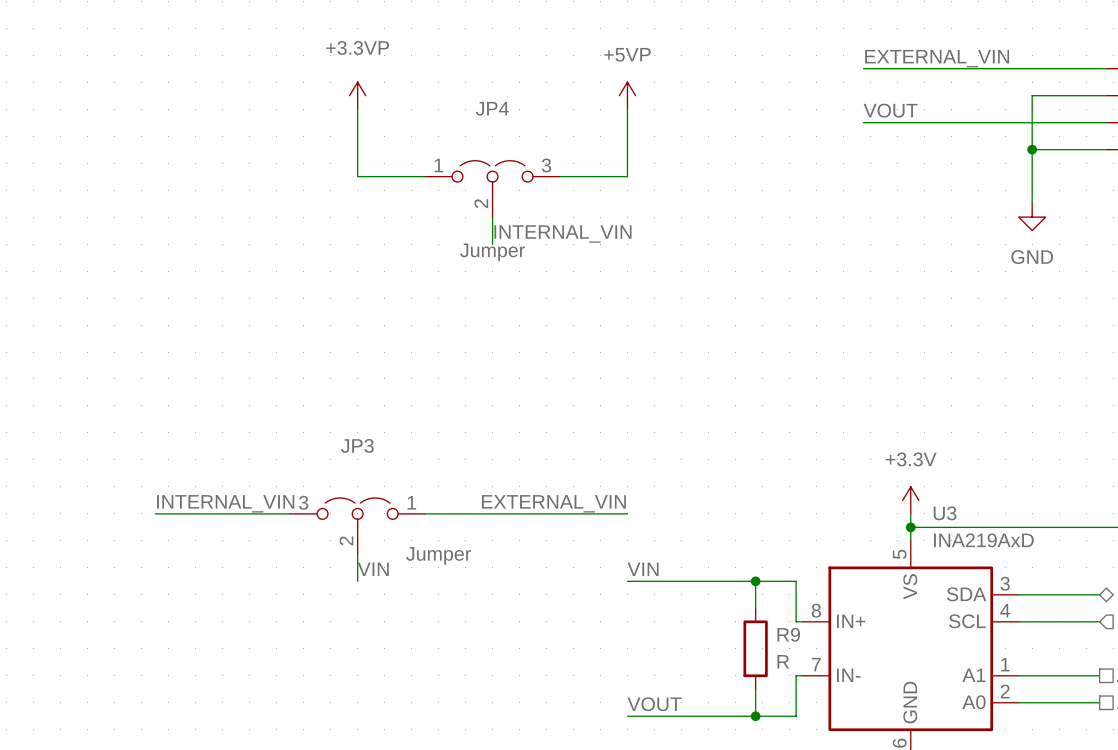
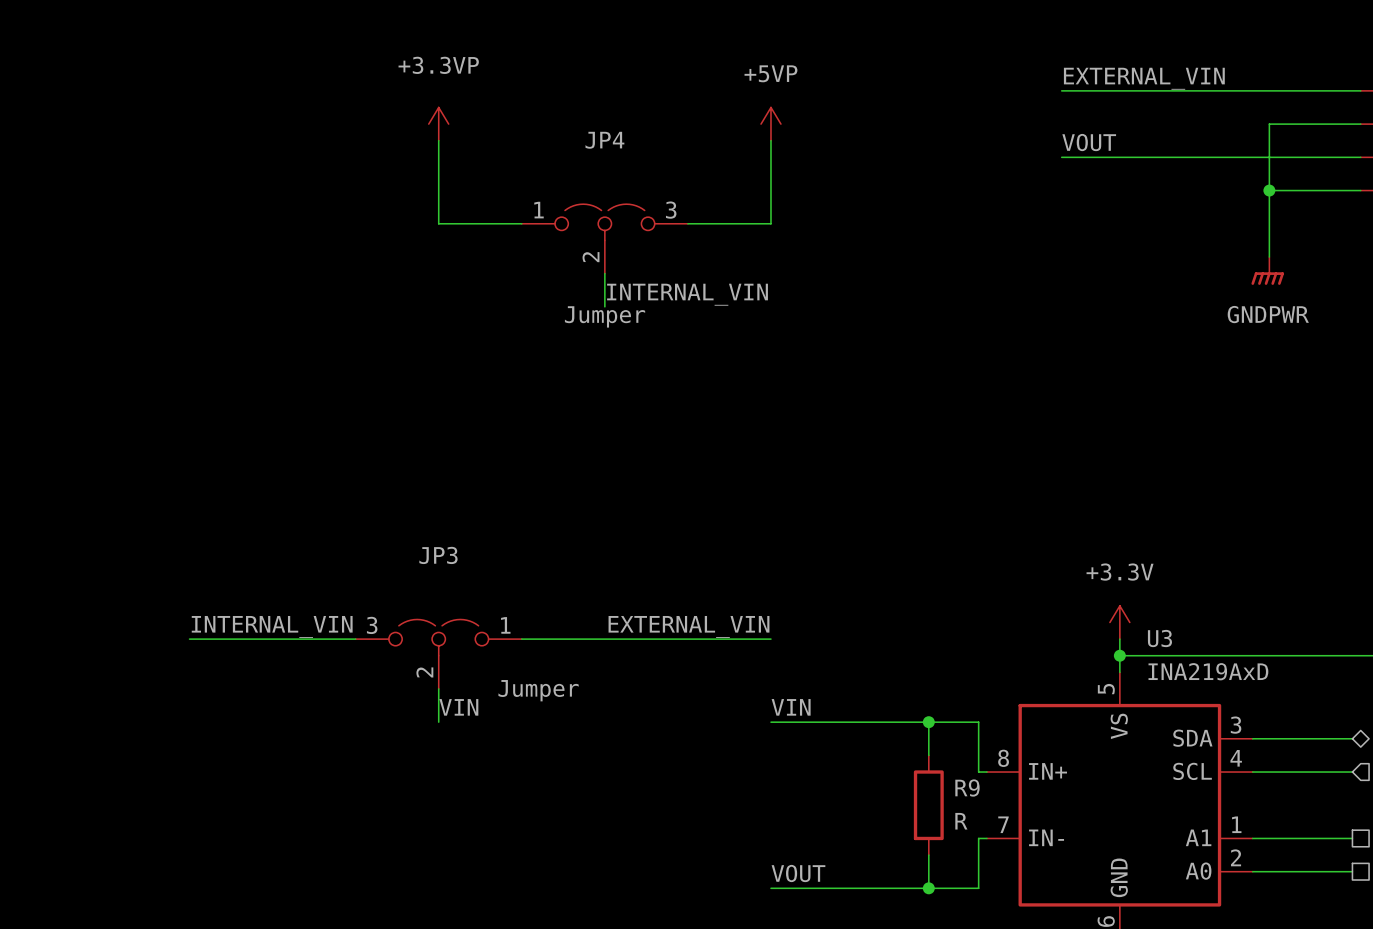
power symbol: GND (1032, 217) -> GNDPWR (1267, 270)

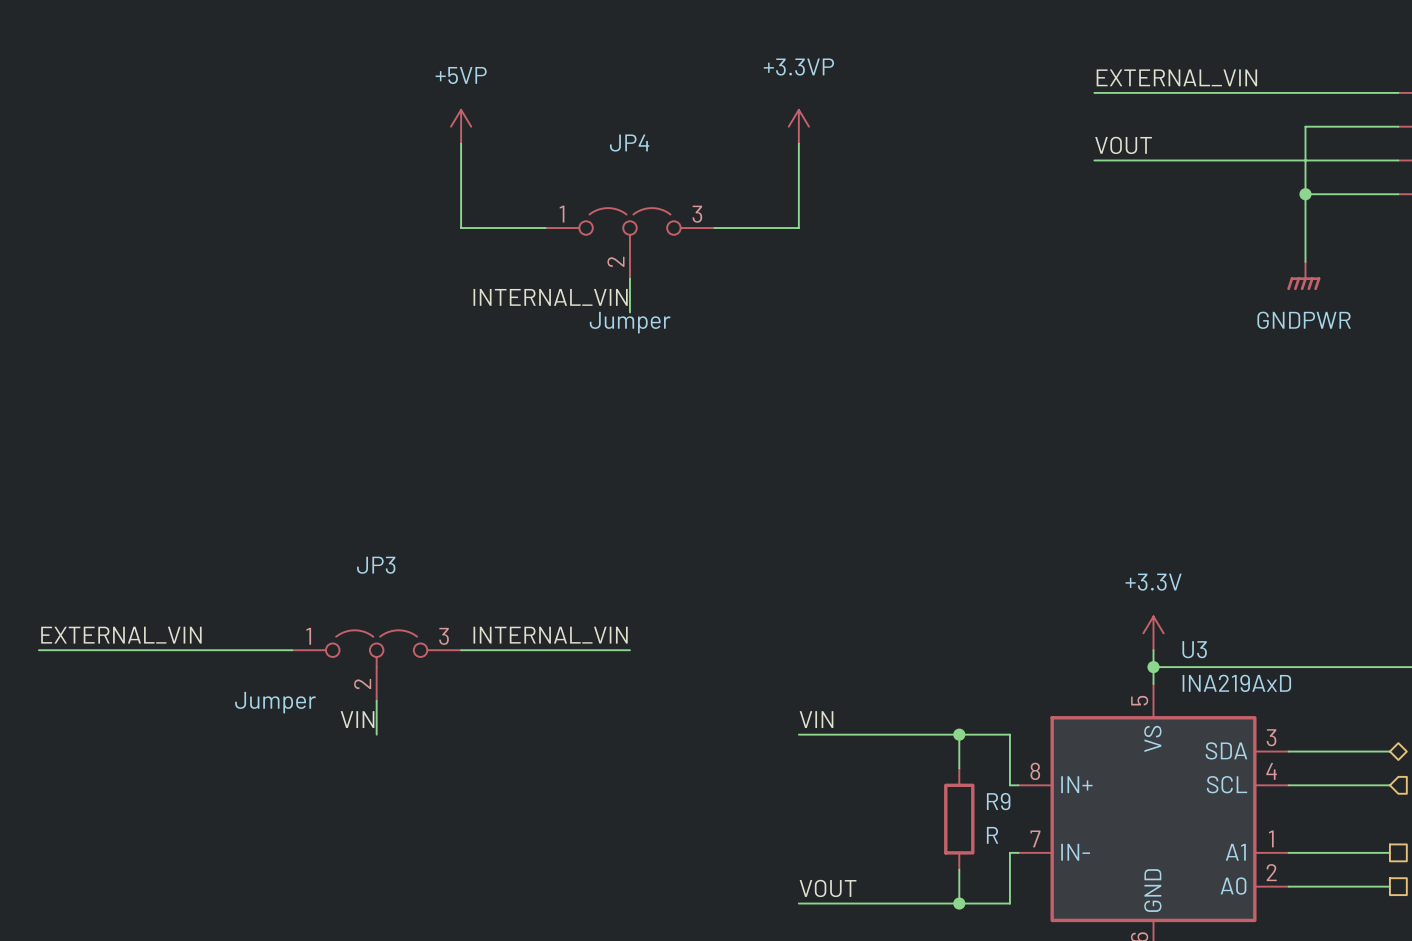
power symbol: +3.3VP (438, 124) -> +5VP (461, 126)
power symbol: +5VP (770, 124) -> +3.3VP (798, 126)
label position: INTERNAL_VIN (687, 294) -> INTERNAL_VIN (550, 297)
label: INTERNAL_VIN (272, 626) -> EXTERNAL_VIN (121, 635)
label: EXTERNAL_VIN (689, 626) -> INTERNAL_VIN (550, 635)
JP3 flip: as is (438, 637) -> left-right (376, 648)
wire: none -> (38, 650) (207, 650)
wire: (272, 639) (355, 639) -> (461, 650) (545, 650)
wire: (604, 639) (770, 639) -> none
wire: (438, 688) (438, 722) -> (376, 700) (376, 734)
label position: VIN (458, 707) -> VIN (357, 719)

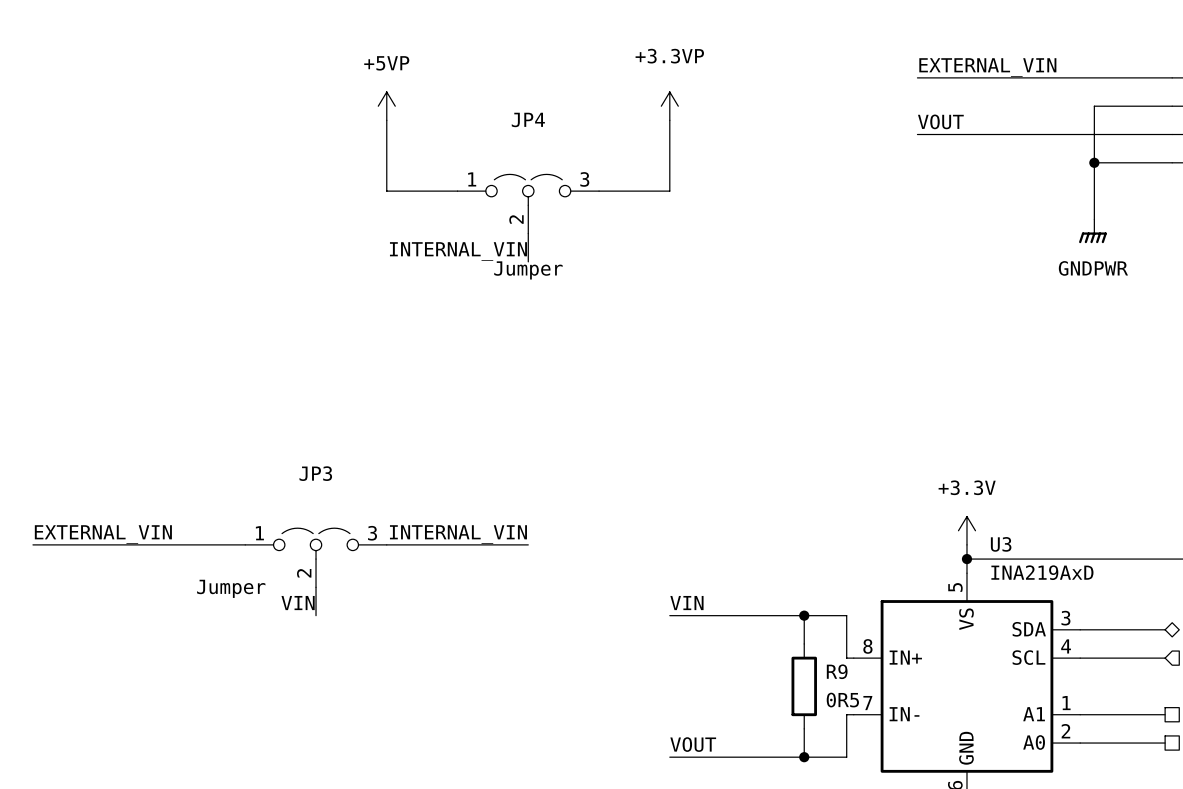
R9 value: R (992, 835) -> 0R5 (842, 700)

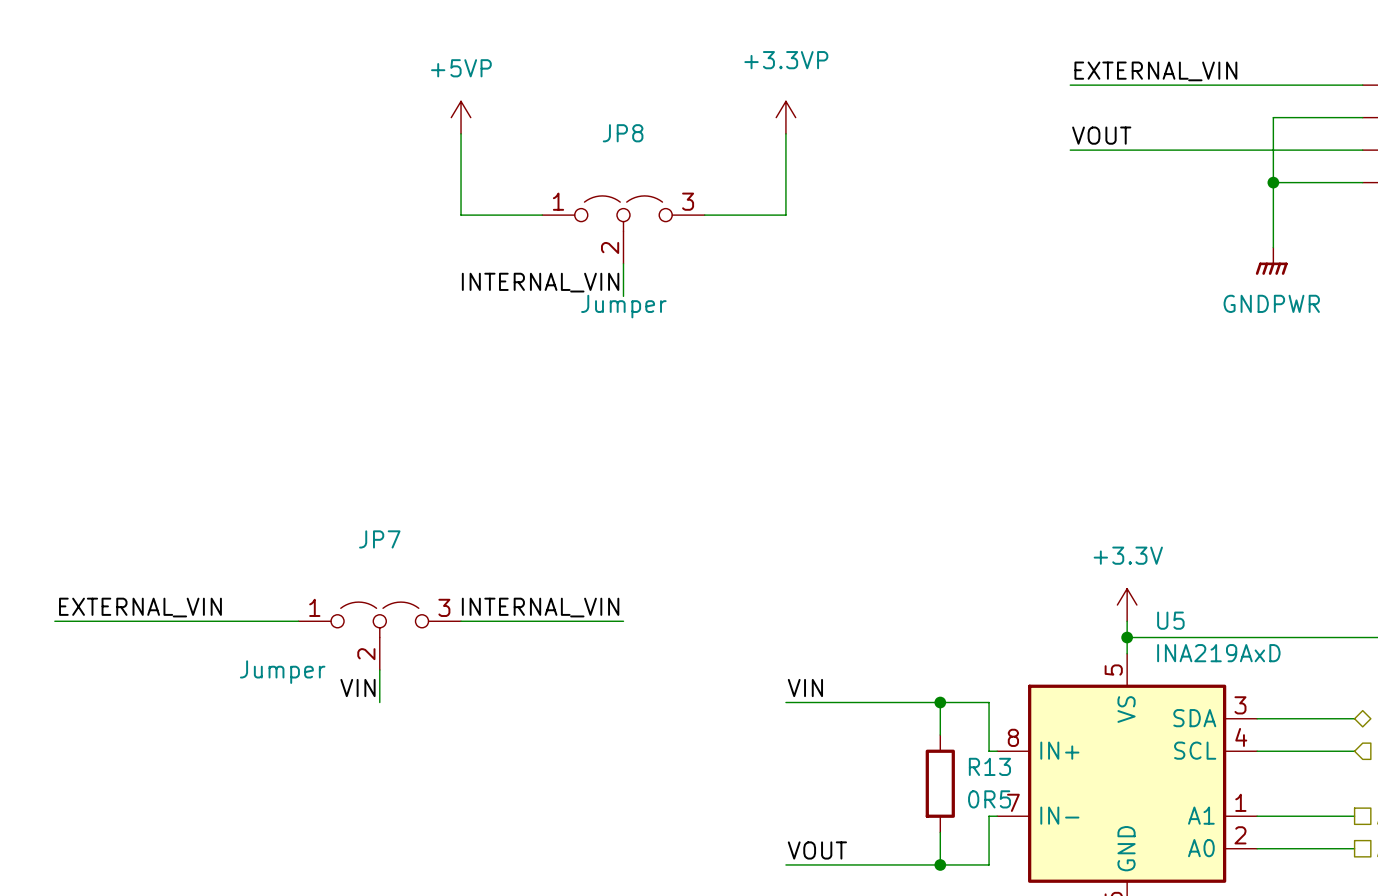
JP4 name: JP4 (528, 119) -> JP8 (623, 133)
JP3 name: JP3 (315, 473) -> JP7 (379, 539)
U3 name: U3 (1001, 544) -> U5 (1170, 620)
R9 name: R9 (837, 671) -> R13 (989, 766)

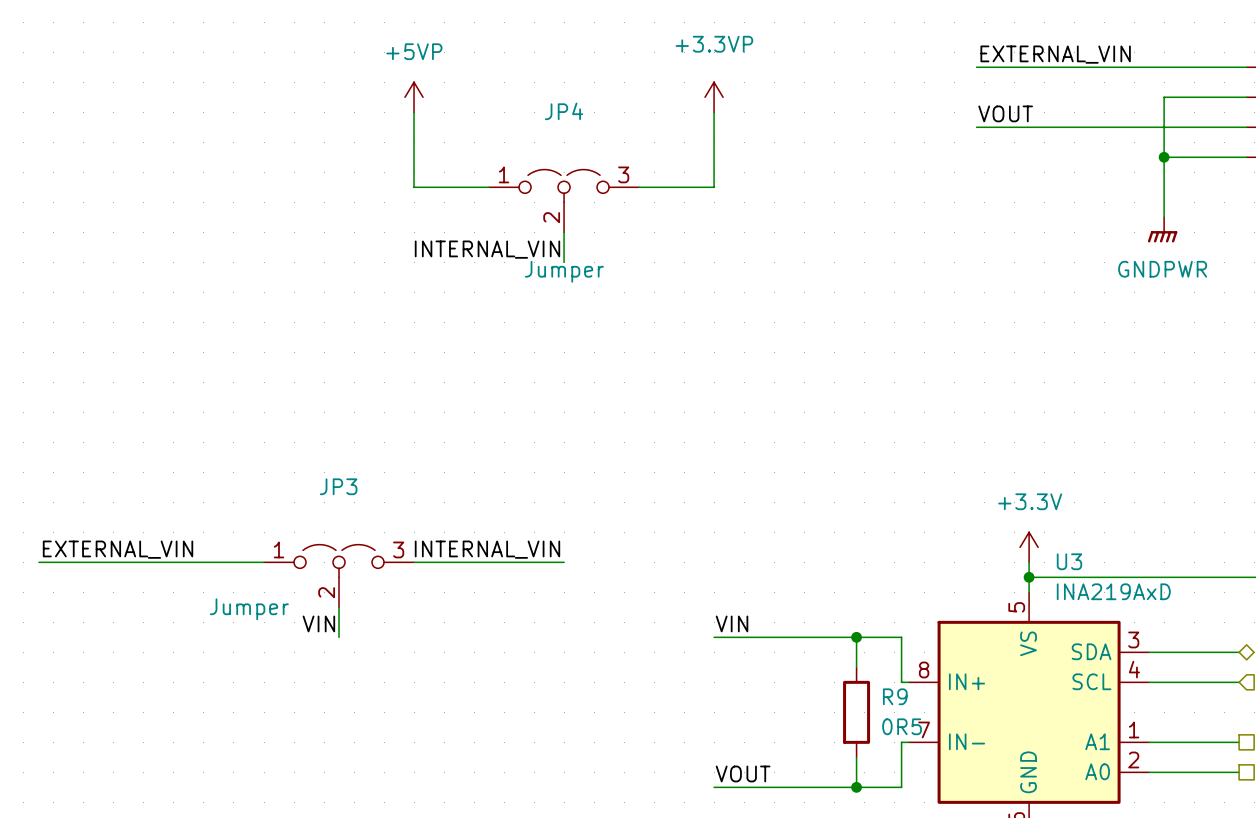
JP8 name: JP8 (623, 133) -> JP4 (564, 111)
JP7 name: JP7 (379, 539) -> JP3 (338, 486)
U5 name: U5 (1170, 620) -> U3 (1069, 561)
R13 name: R13 (989, 766) -> R9 (895, 696)

